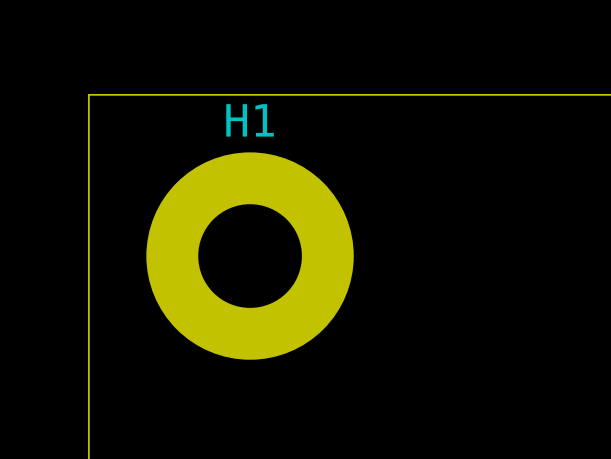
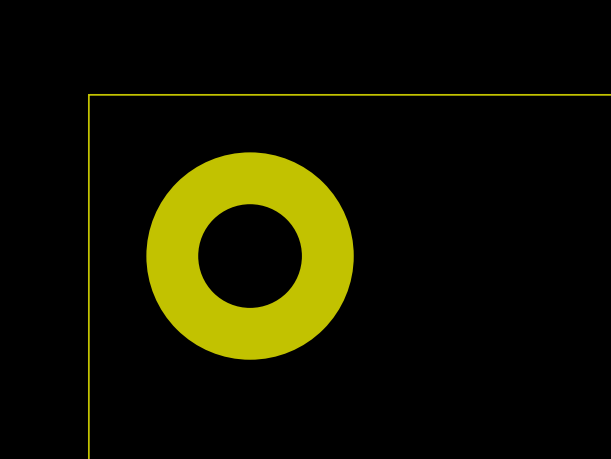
H1 name: H1 (250, 120) -> none

